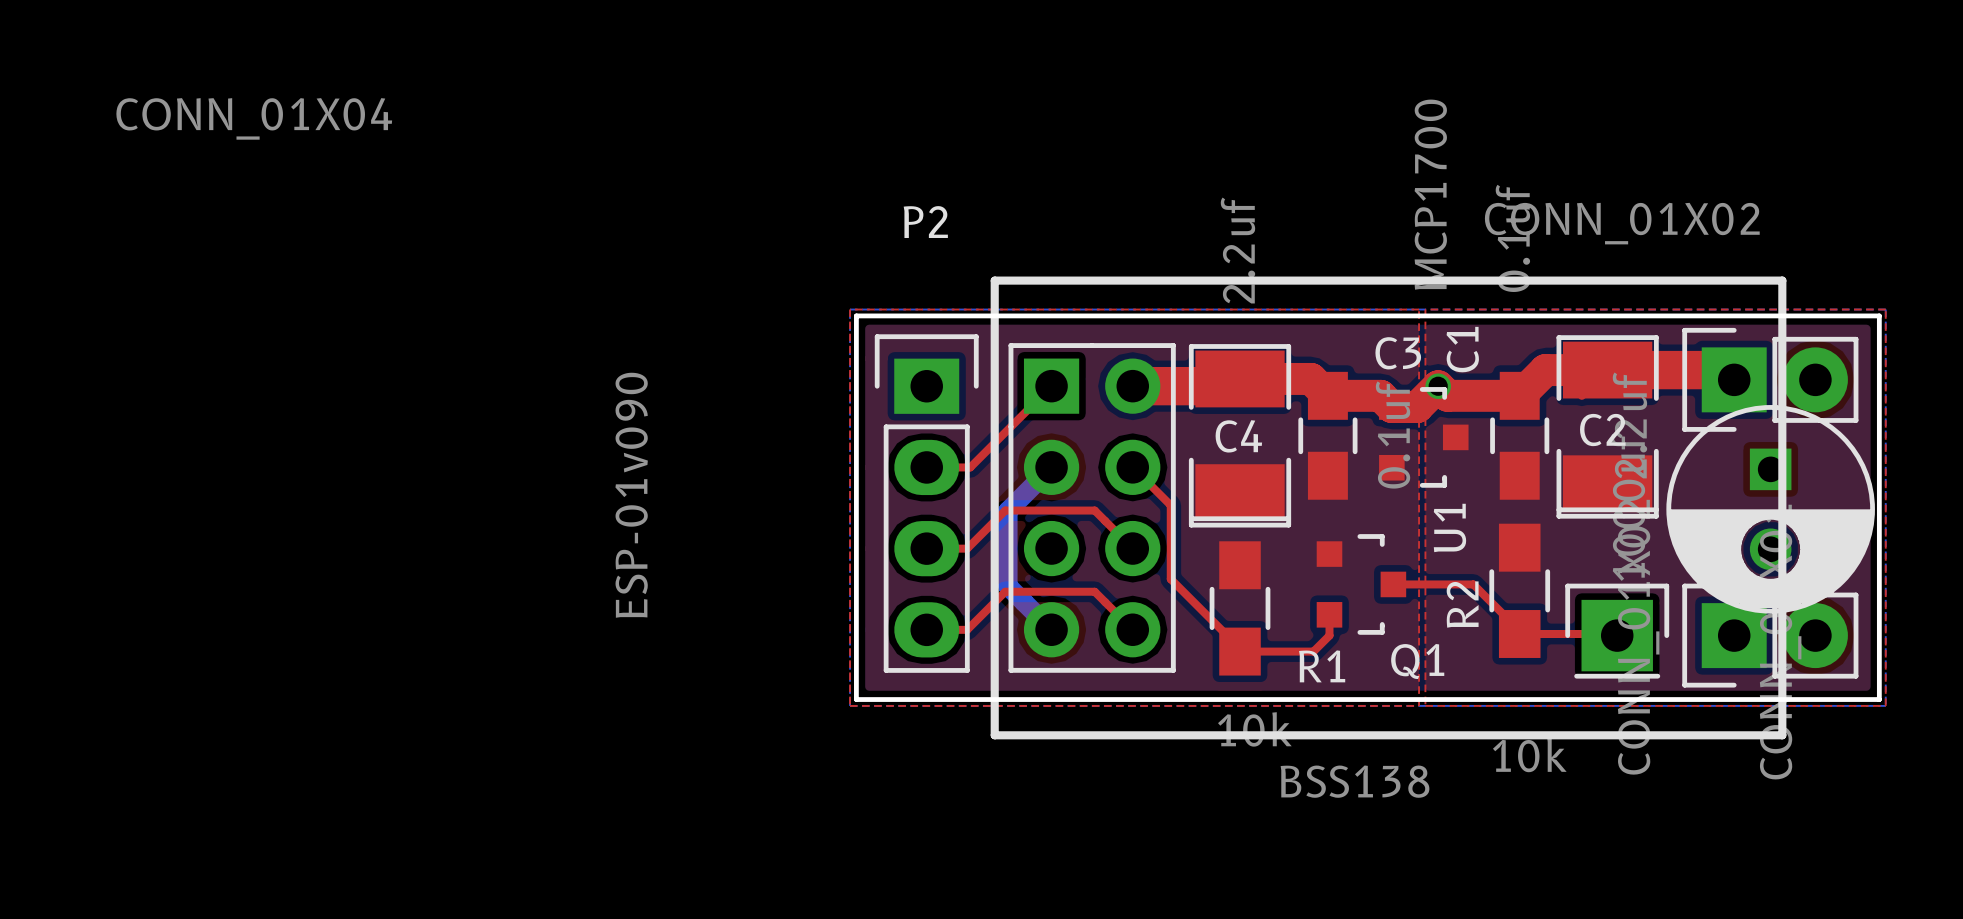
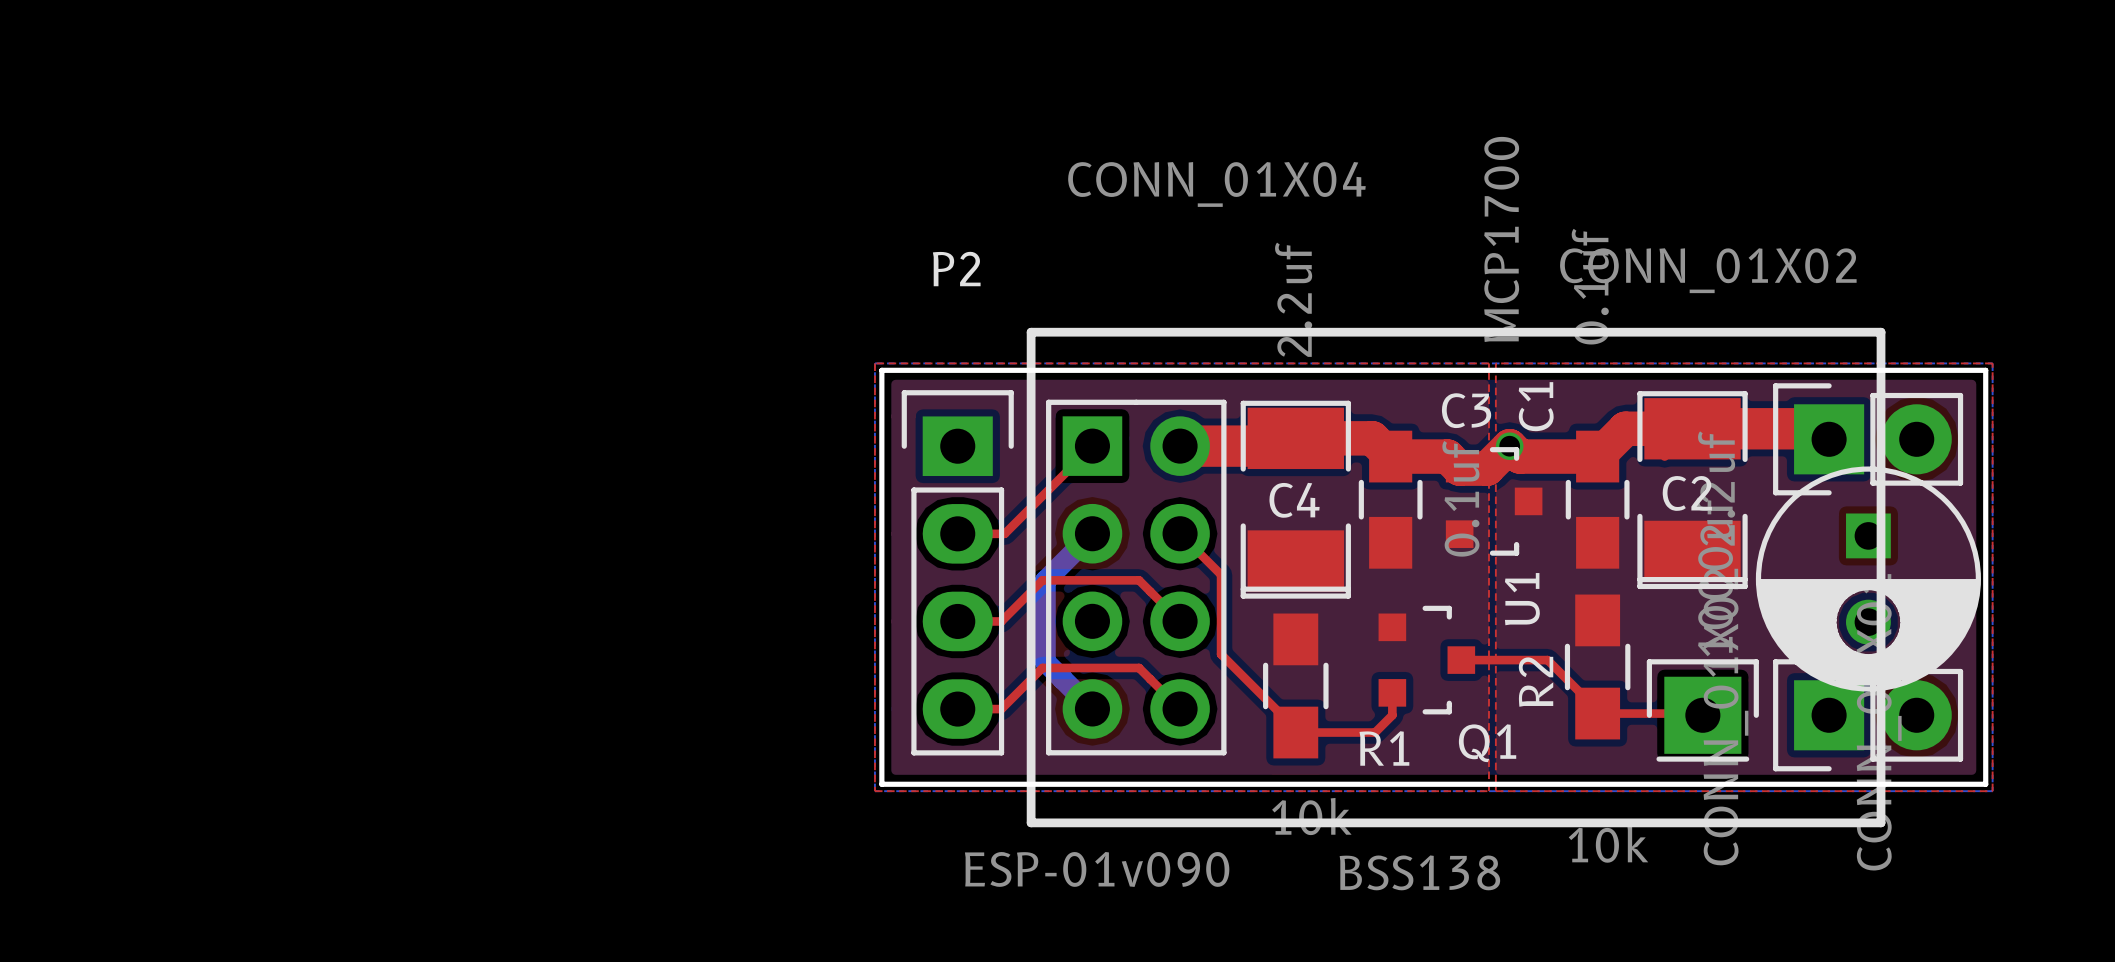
P2 value position: CONN_01X04 (254, 118) -> CONN_01X04 (1216, 184)
part value rotation: 0° (631, 495) -> 90° clockwise (1097, 869)
part value position: ESP-01v090 (631, 495) -> ESP-01v090 (1097, 869)

